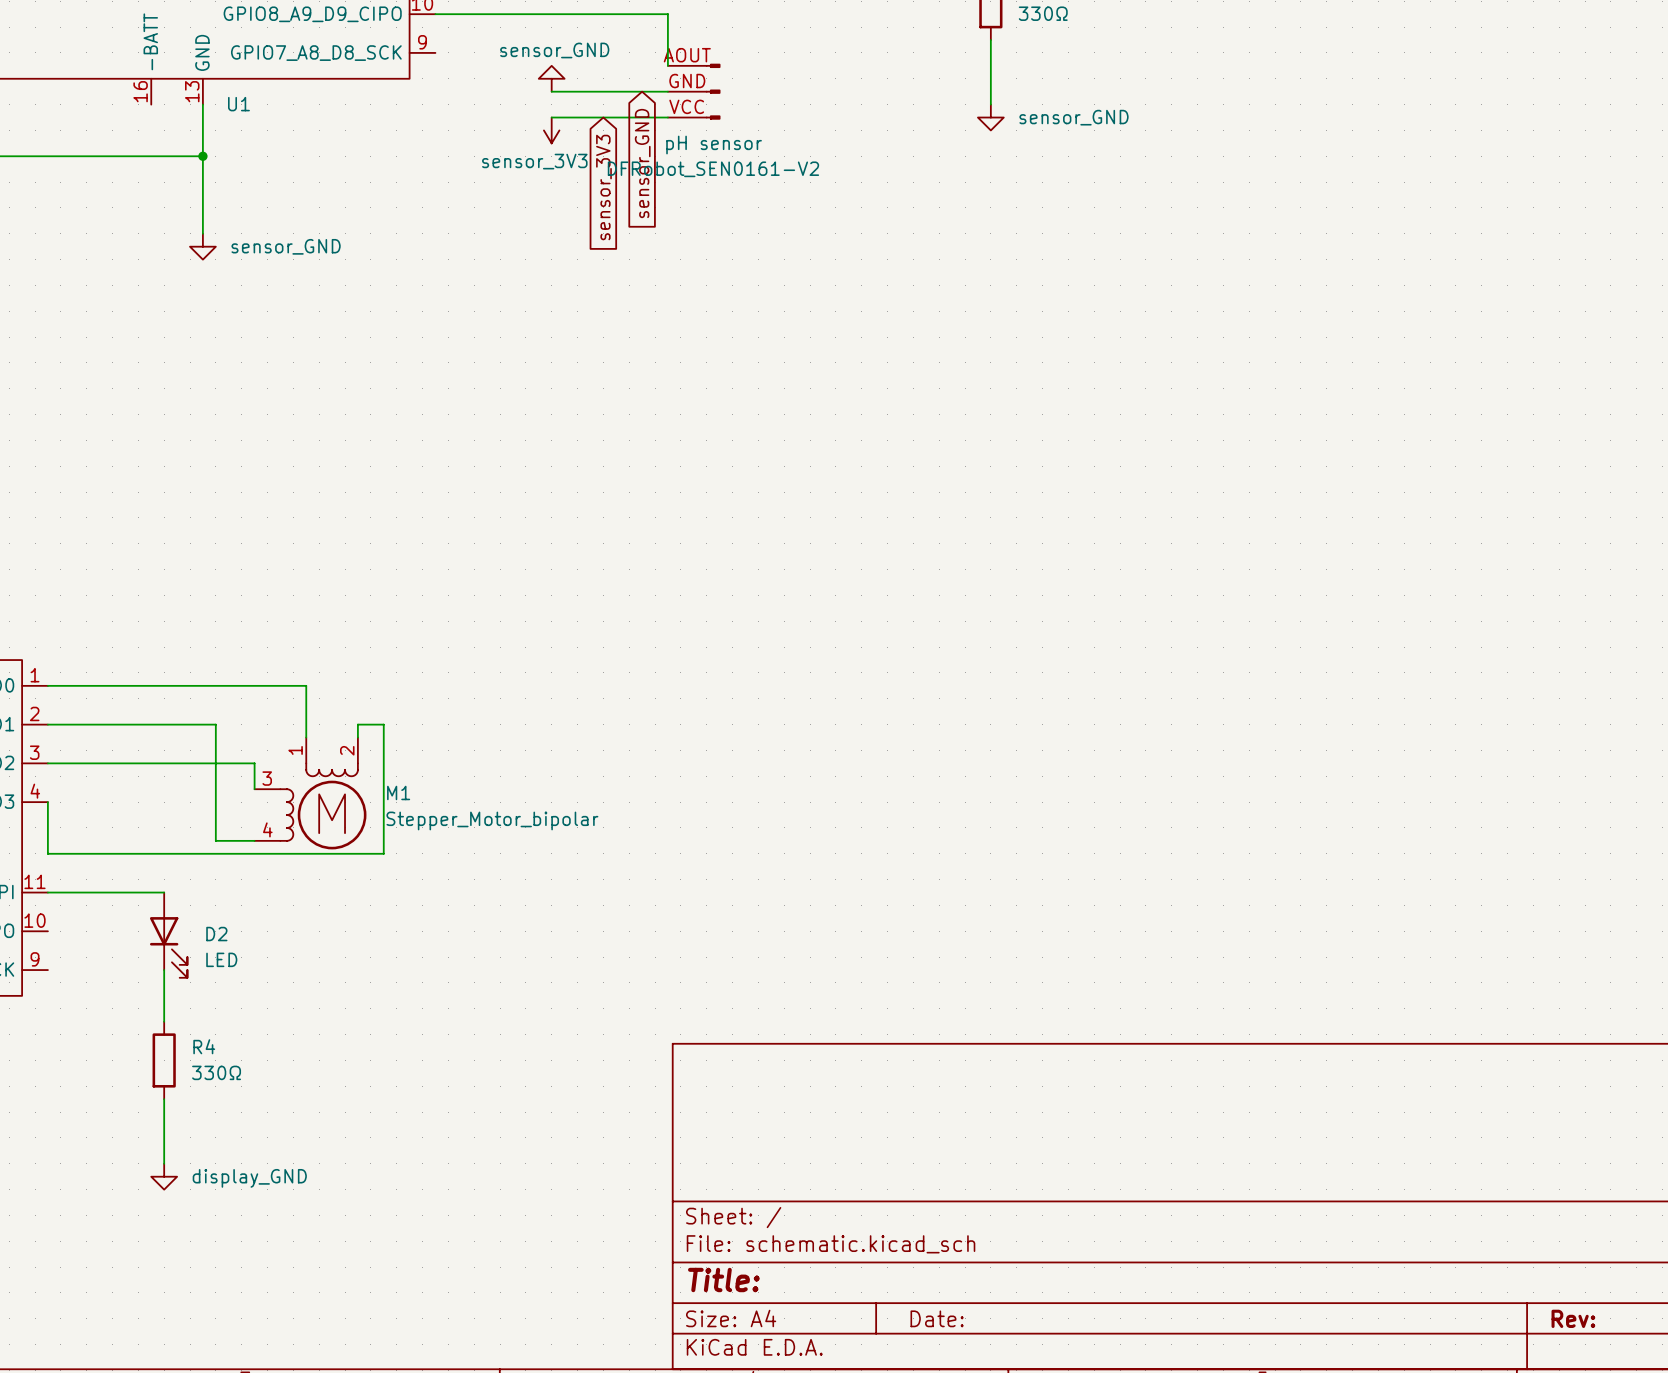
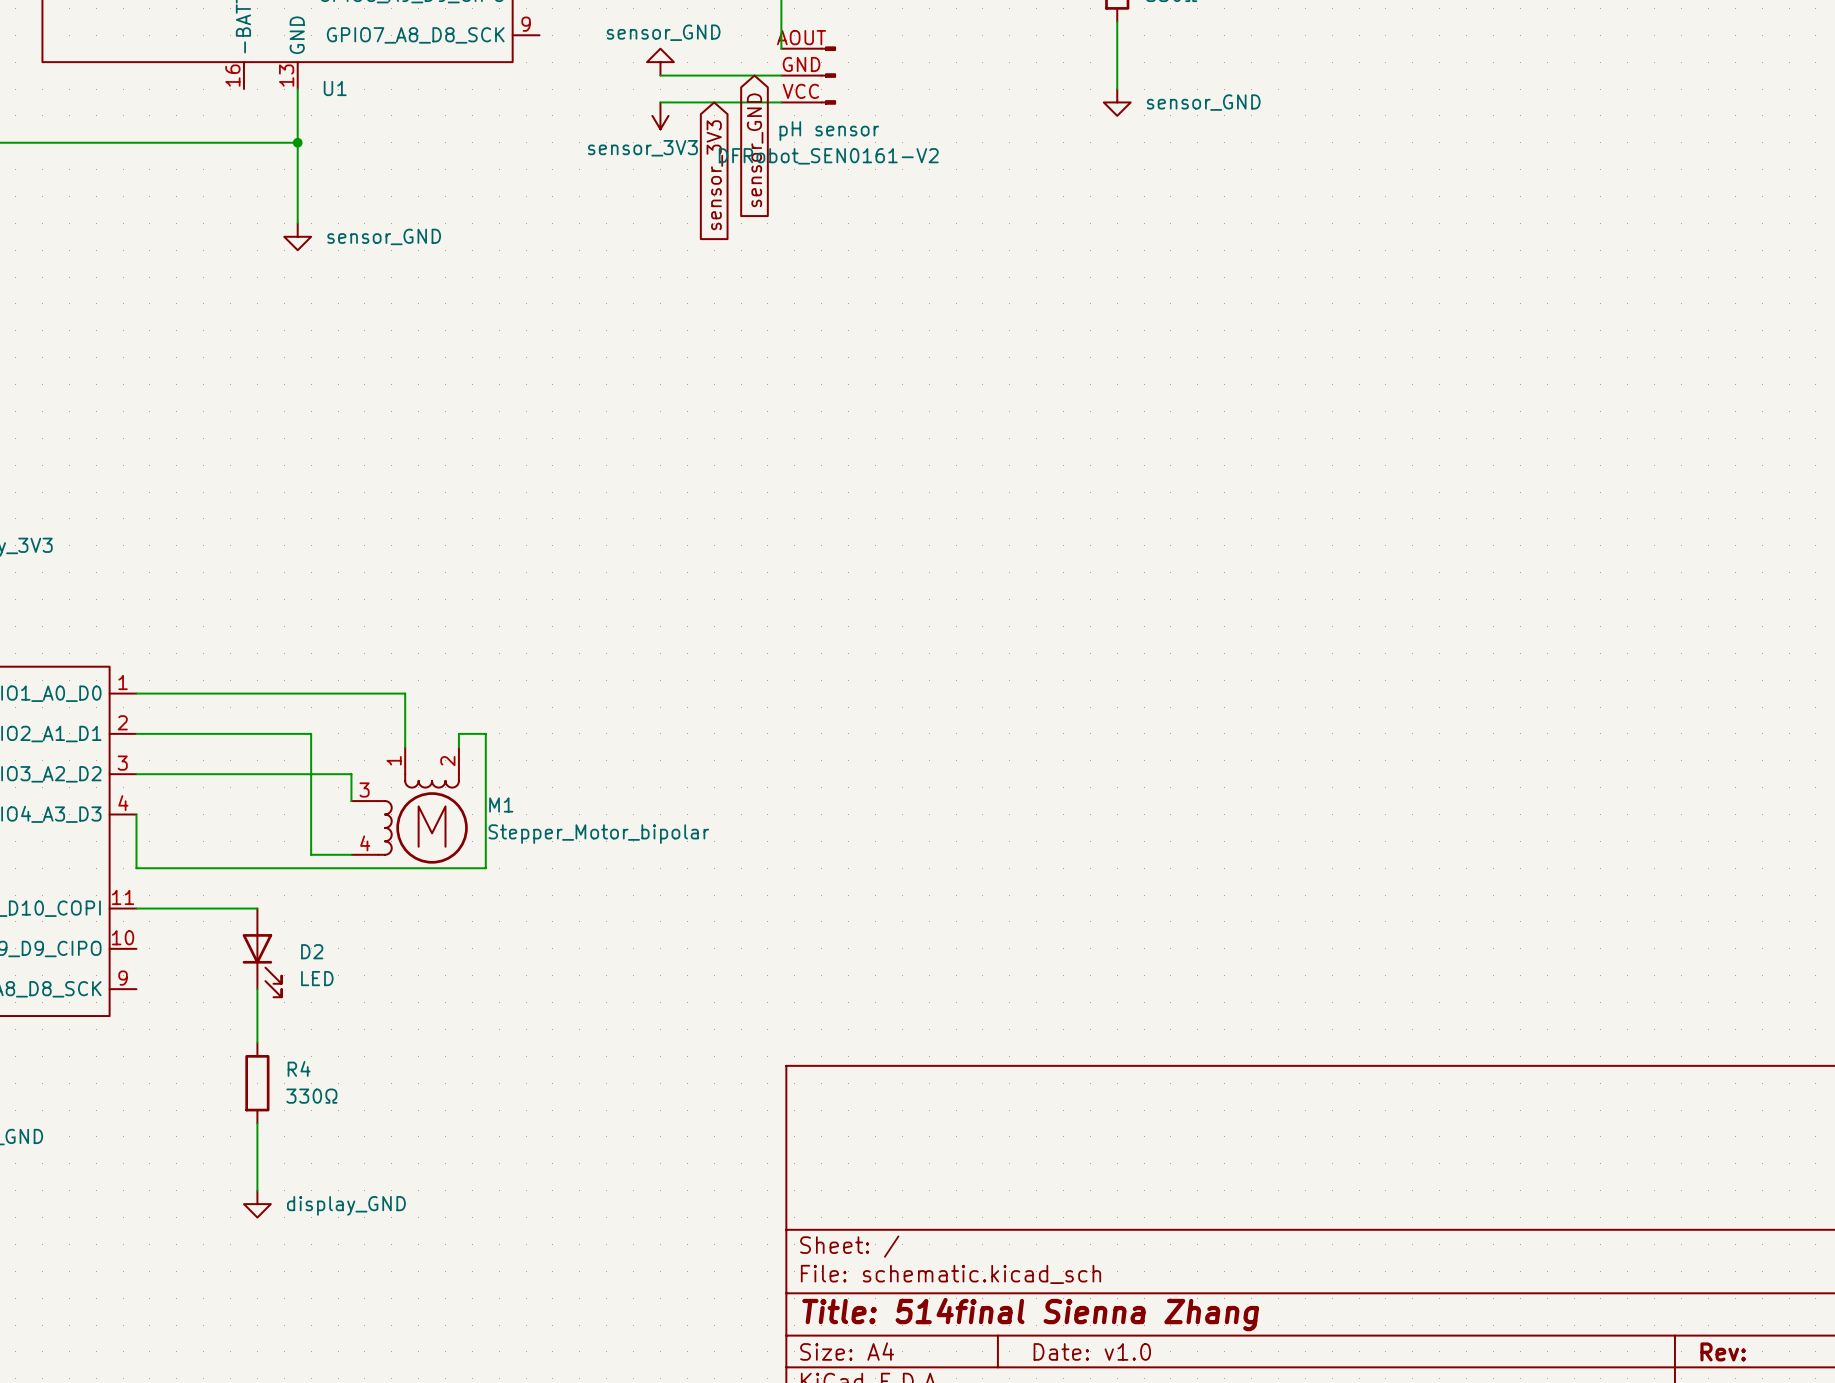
title block: Title: (723, 1280) -> Title: 514final Sienna Zhang (1030, 1314)
title block: Date: (937, 1318) -> Date: v1.0 (1092, 1351)

